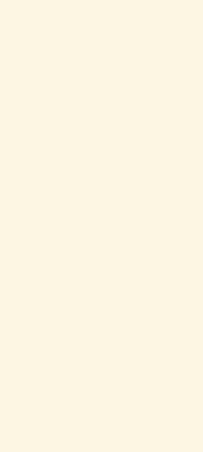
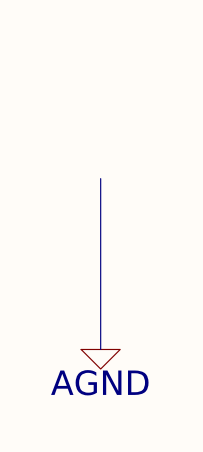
wire: none -> (100, 178) (100, 349)
power symbol: none -> AGND (100, 359)

